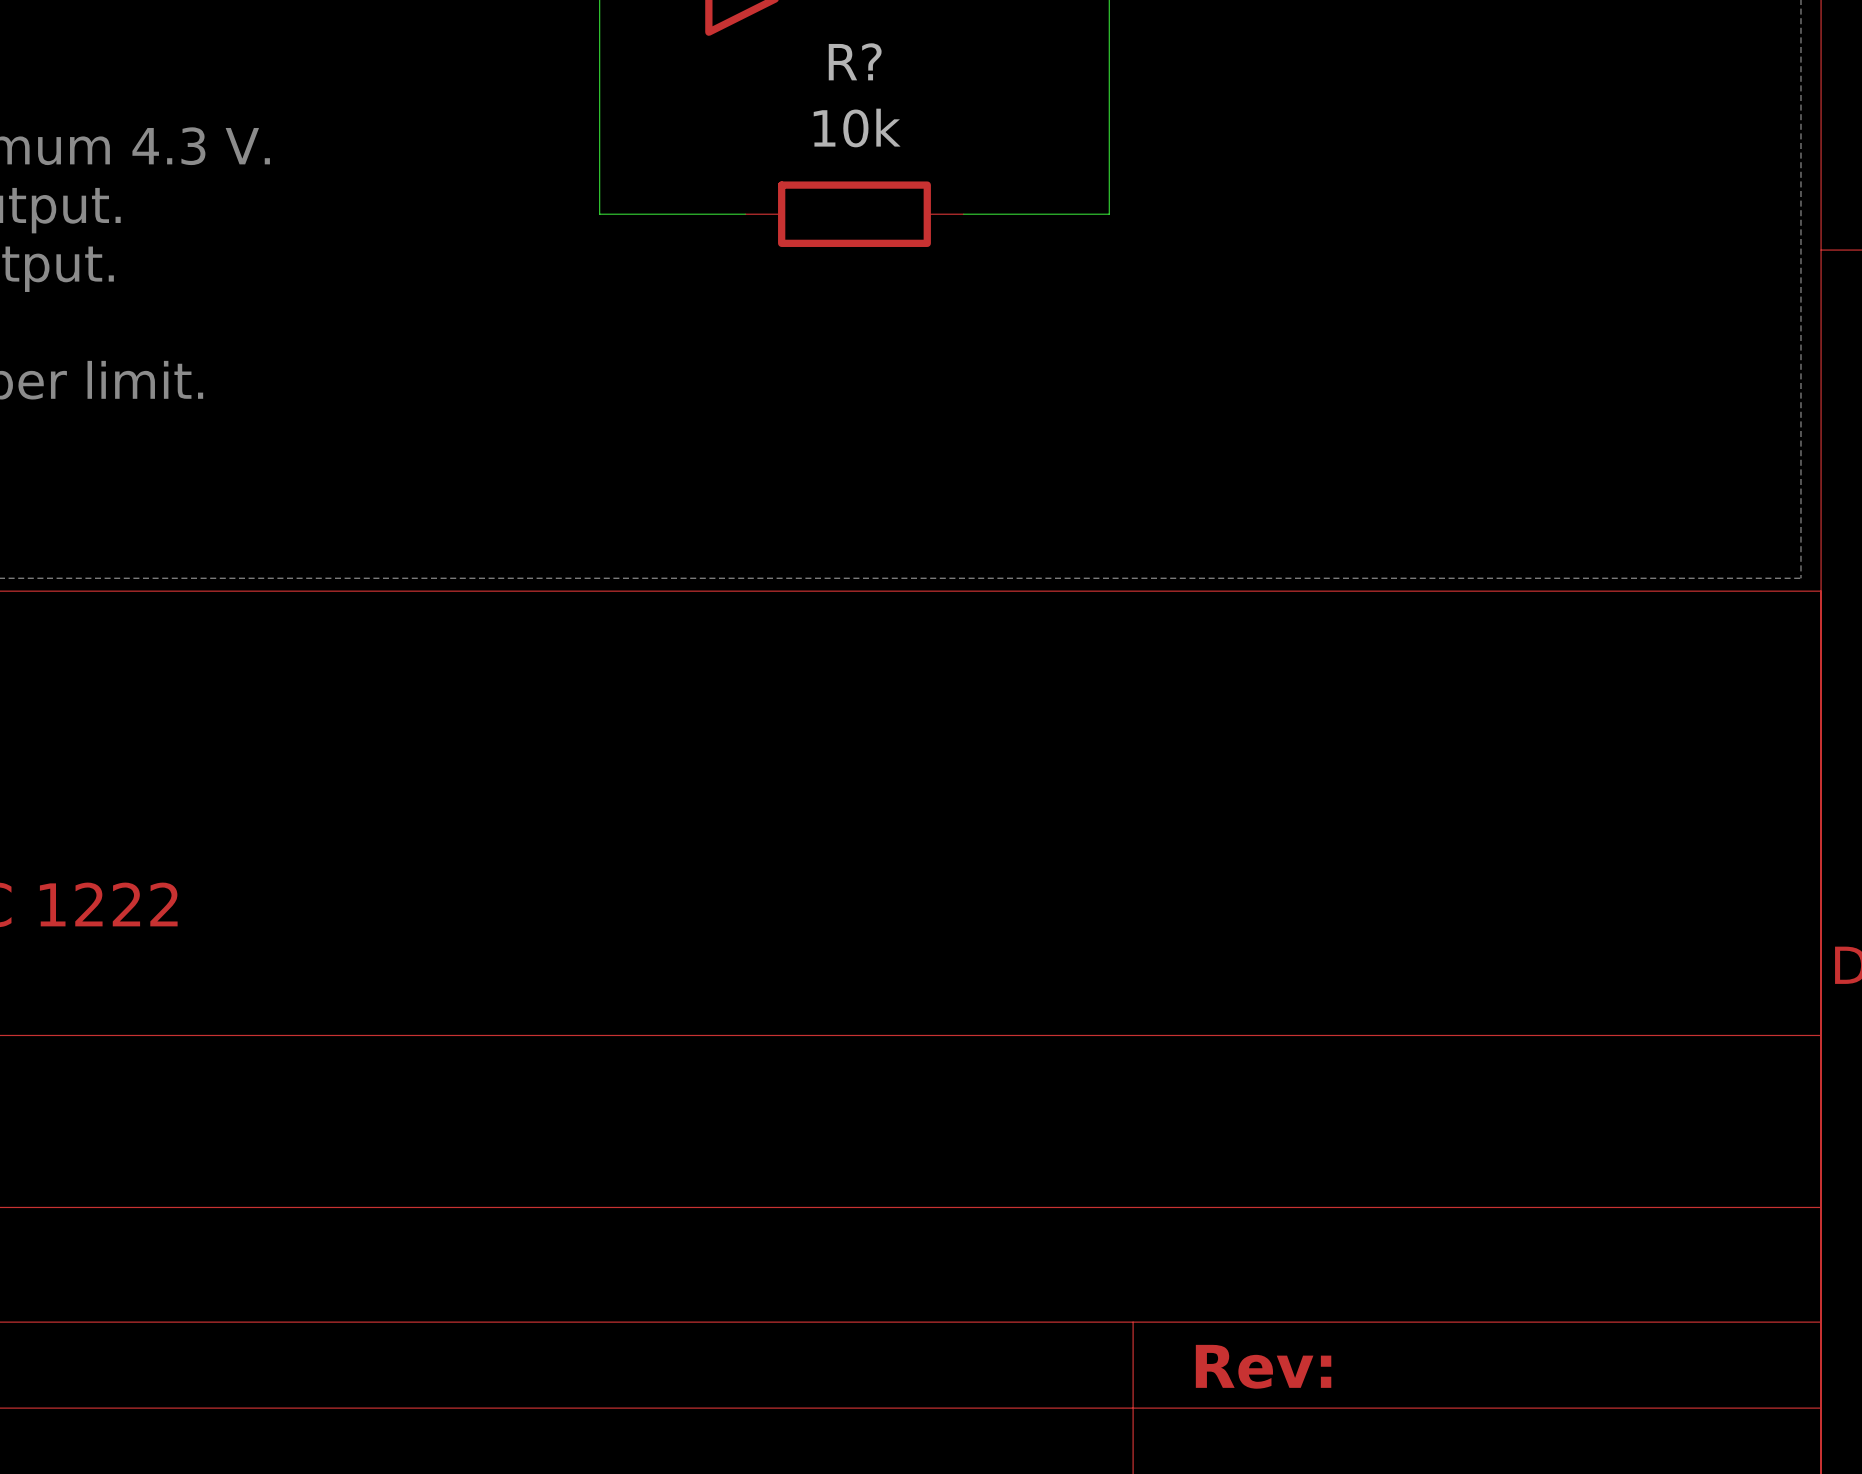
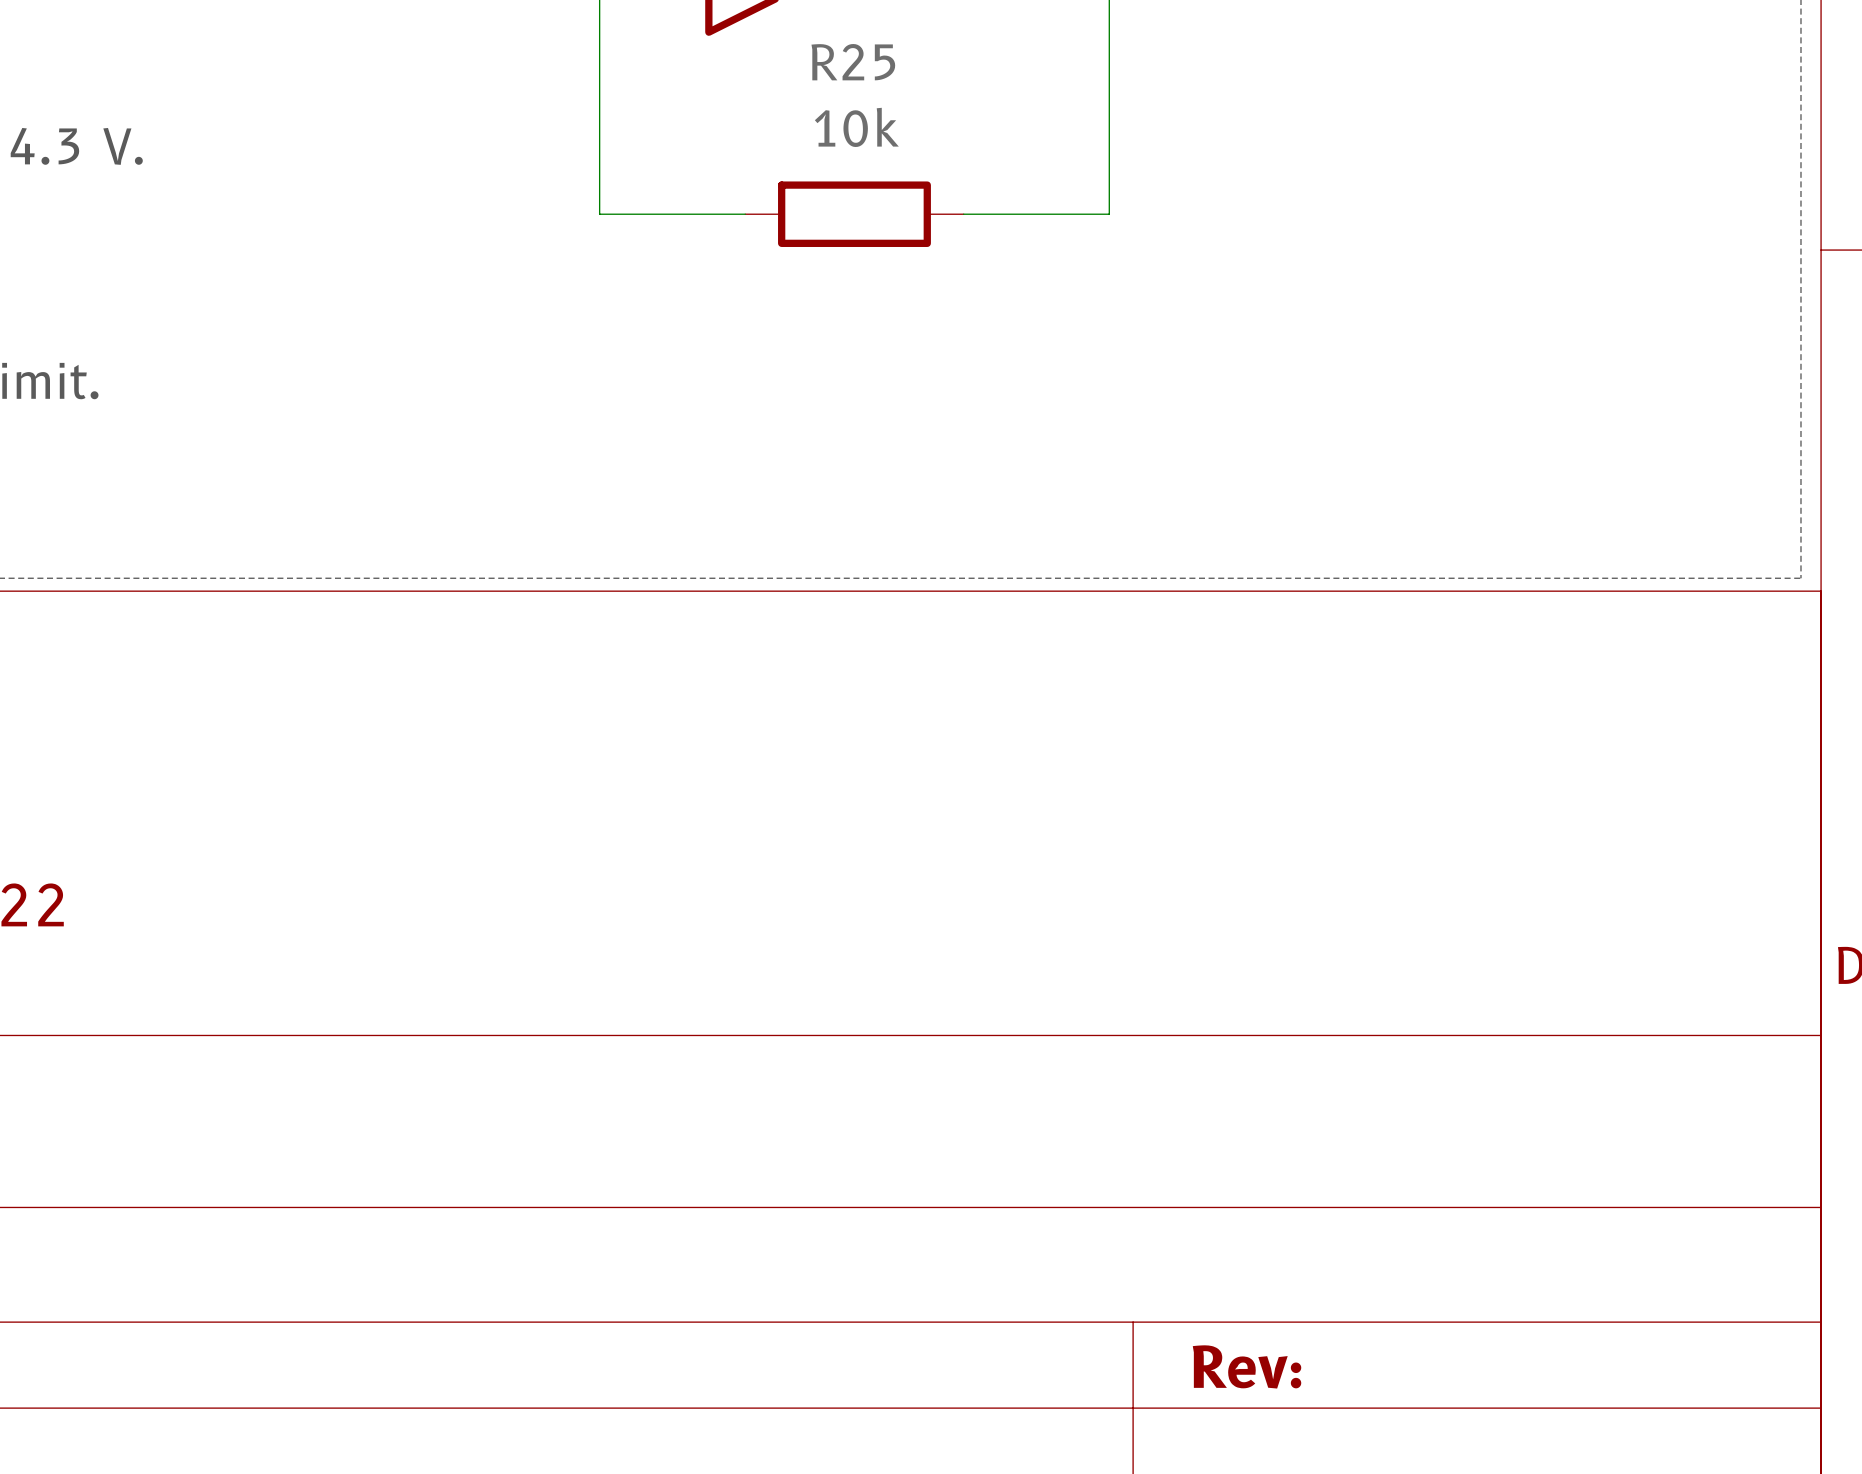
R? name: R? (855, 61) -> R25 (853, 62)

